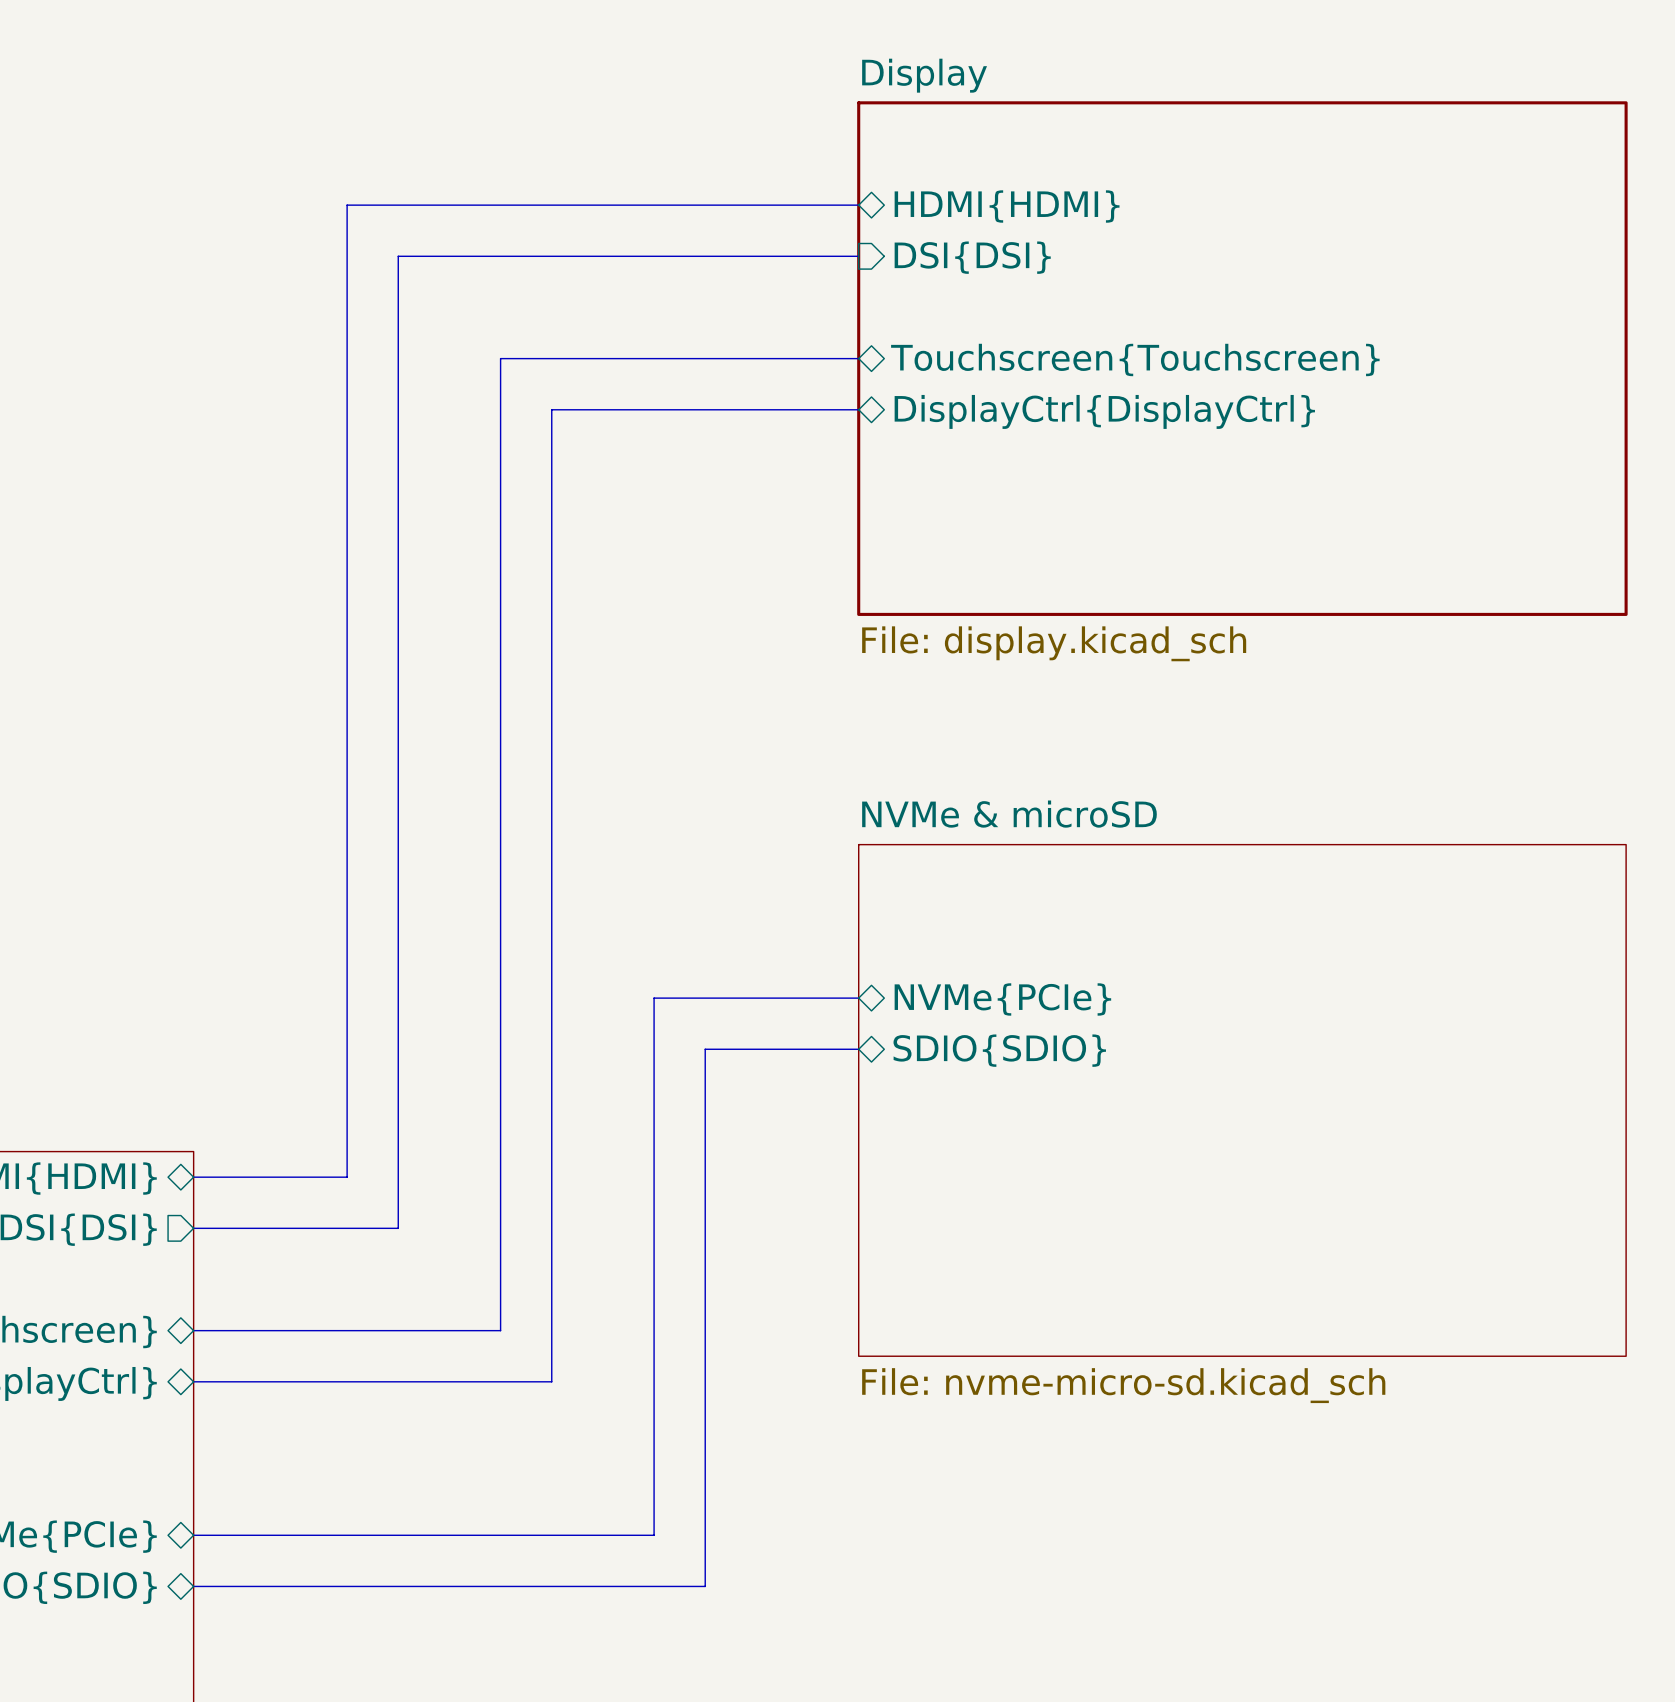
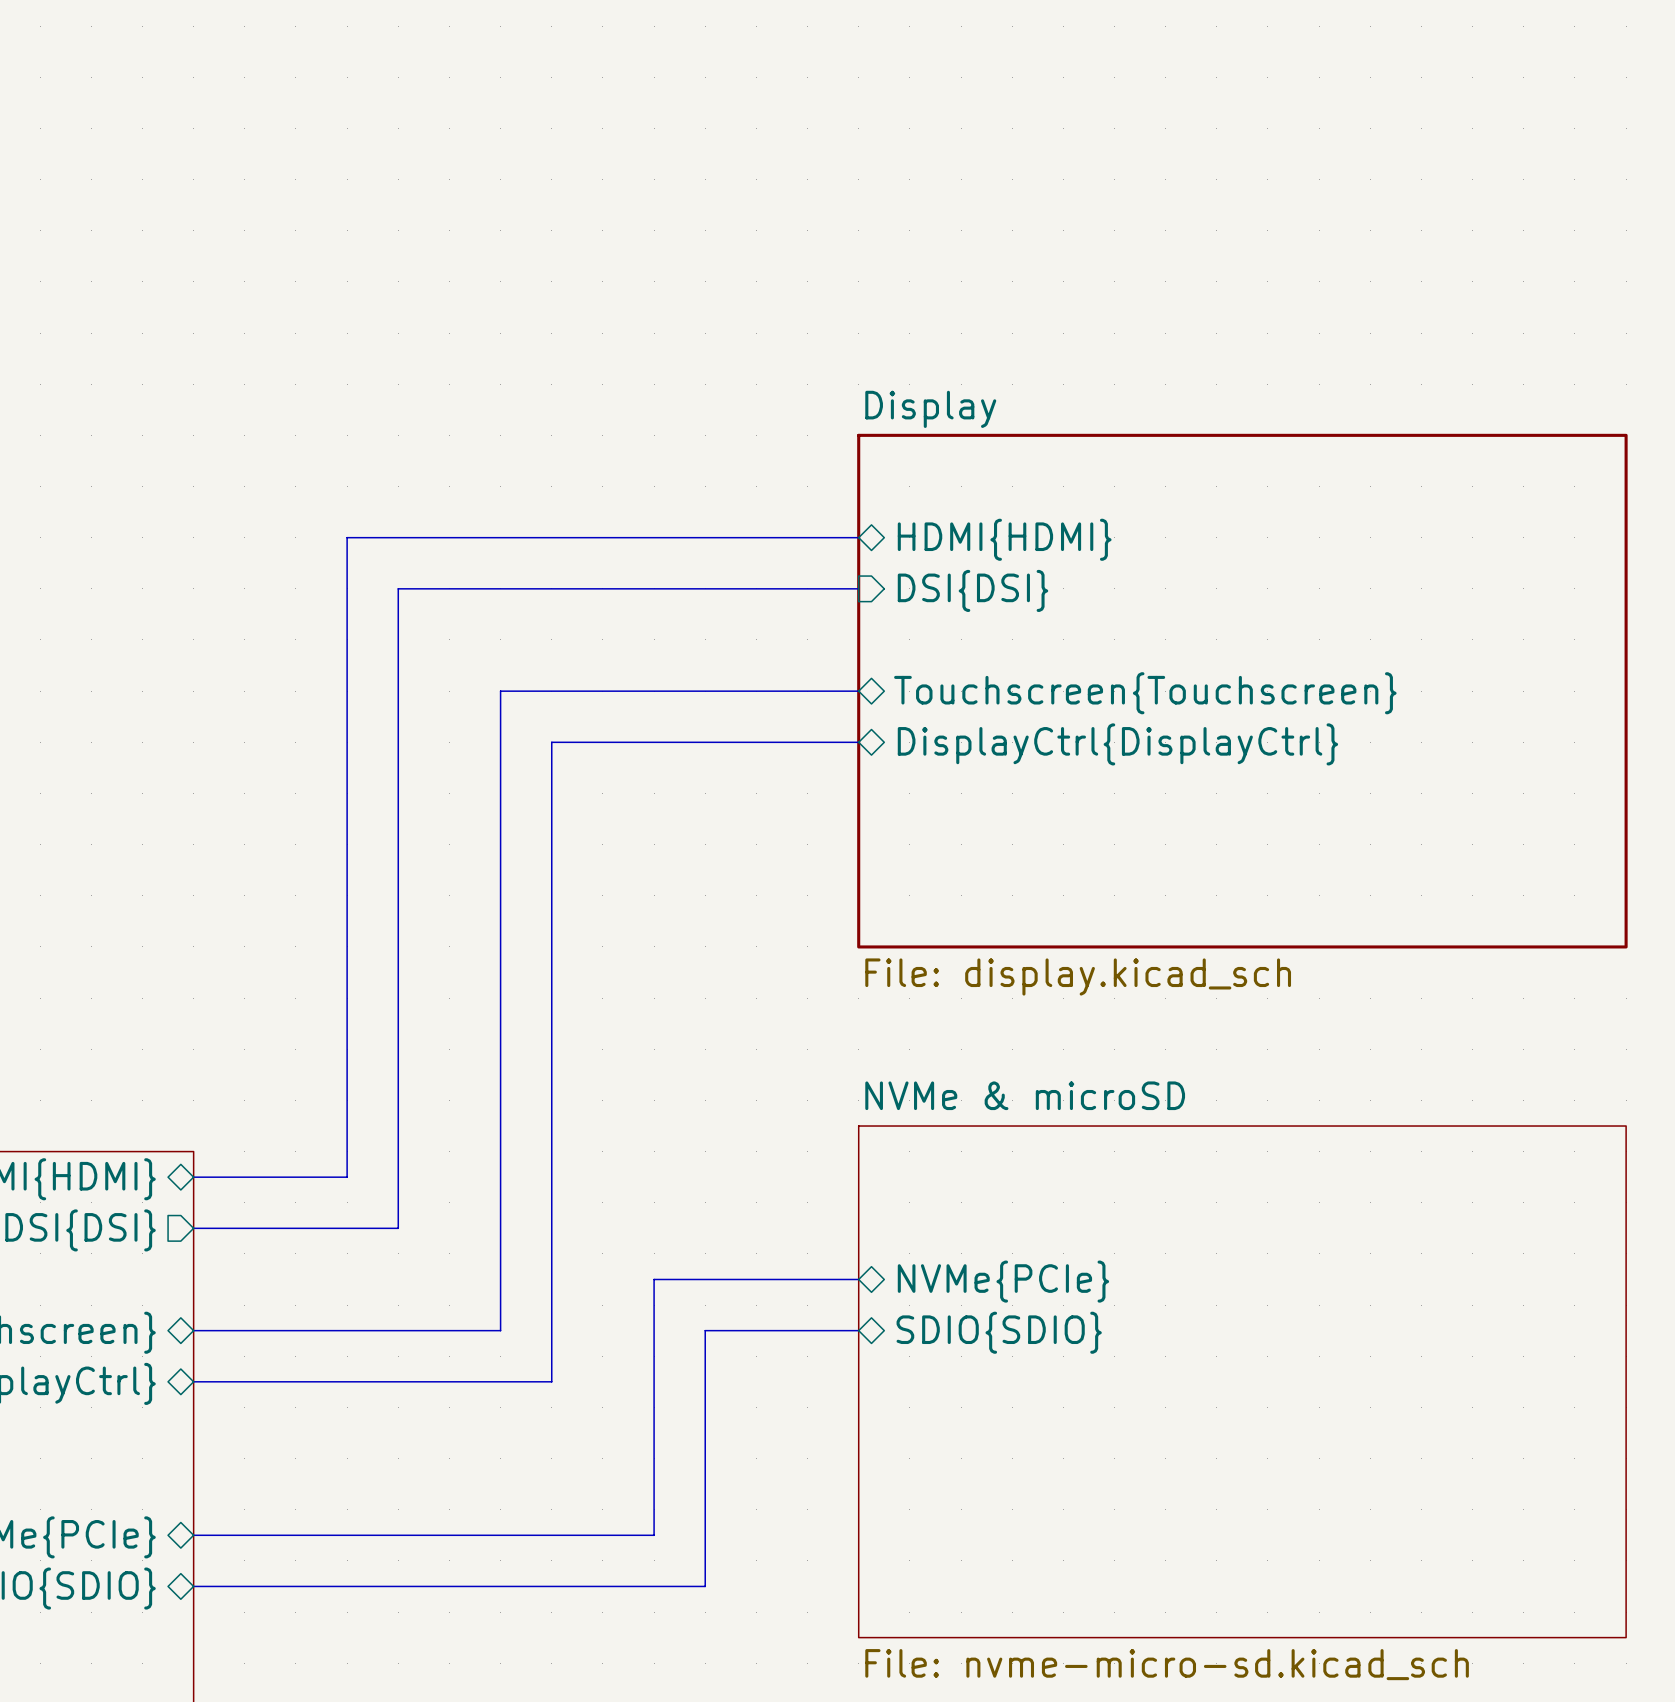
bus: (858, 205) (347, 205) (347, 537) -> (858, 537) (347, 537)
sheet pin position: HDMI{HDMI} (1007, 206) -> HDMI{HDMI} (1004, 539)
bus: (858, 256) (398, 256) (398, 588) -> (858, 588) (398, 588)
sheet pin position: DSI{DSI} (972, 257) -> DSI{DSI} (973, 590)
bus: (858, 358) (500, 358) (500, 691) -> (858, 691) (500, 691)
sheet Display position: (1242, 358) -> (1242, 691)
sheet pin position: Touchscreen{Touchscreen} (1135, 359) -> Touchscreen{Touchscreen} (1145, 693)
bus: (858, 409) (551, 409) (551, 742) -> (858, 742) (551, 742)
sheet pin position: DisplayCtrl{DisplayCtrl} (1104, 411) -> DisplayCtrl{DisplayCtrl} (1117, 744)
bus: (858, 998) (654, 998) (654, 1279) -> (858, 1279) (654, 1279)
sheet pin position: NVMe{PCIe} (1002, 999) -> NVMe{PCIe} (1003, 1281)
bus: (858, 1049) (705, 1049) (705, 1330) -> (858, 1330) (705, 1330)
sheet pin position: SDIO{SDIO} (999, 1050) -> SDIO{SDIO} (999, 1332)
sheet NVMe & microSD position: (1242, 1100) -> (1242, 1381)

